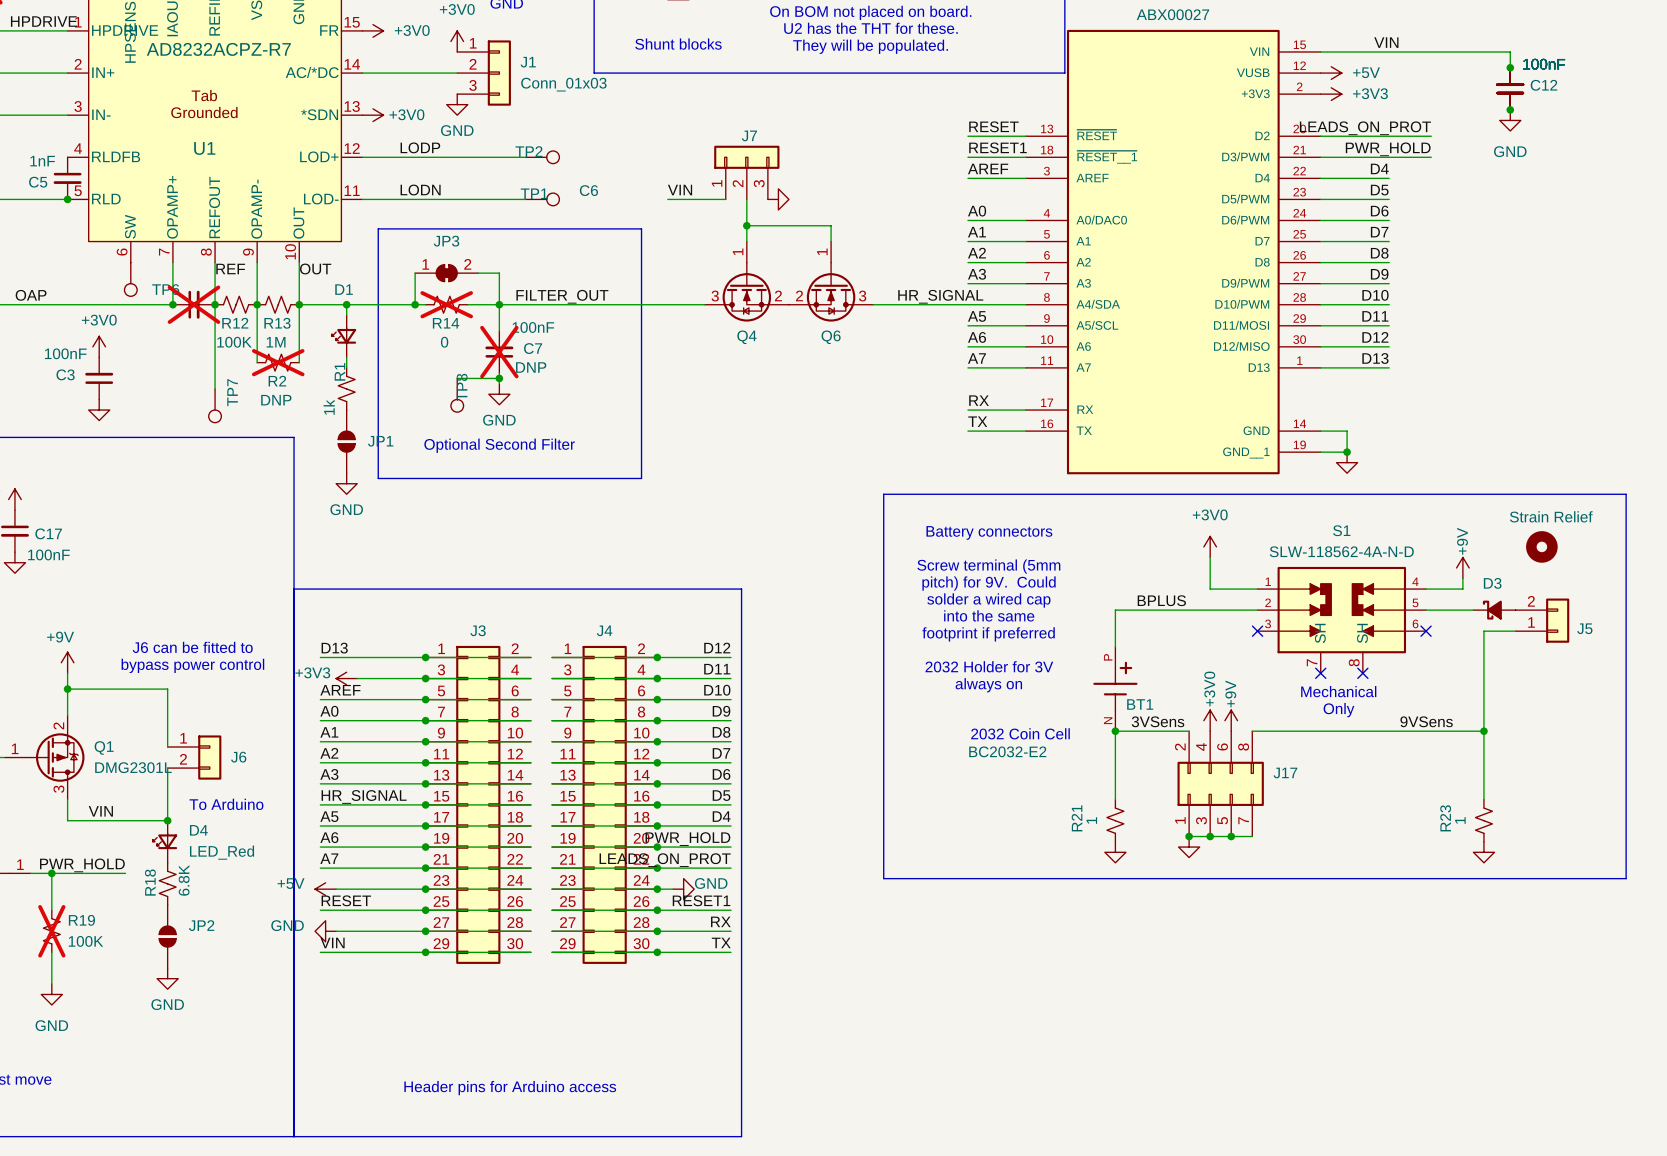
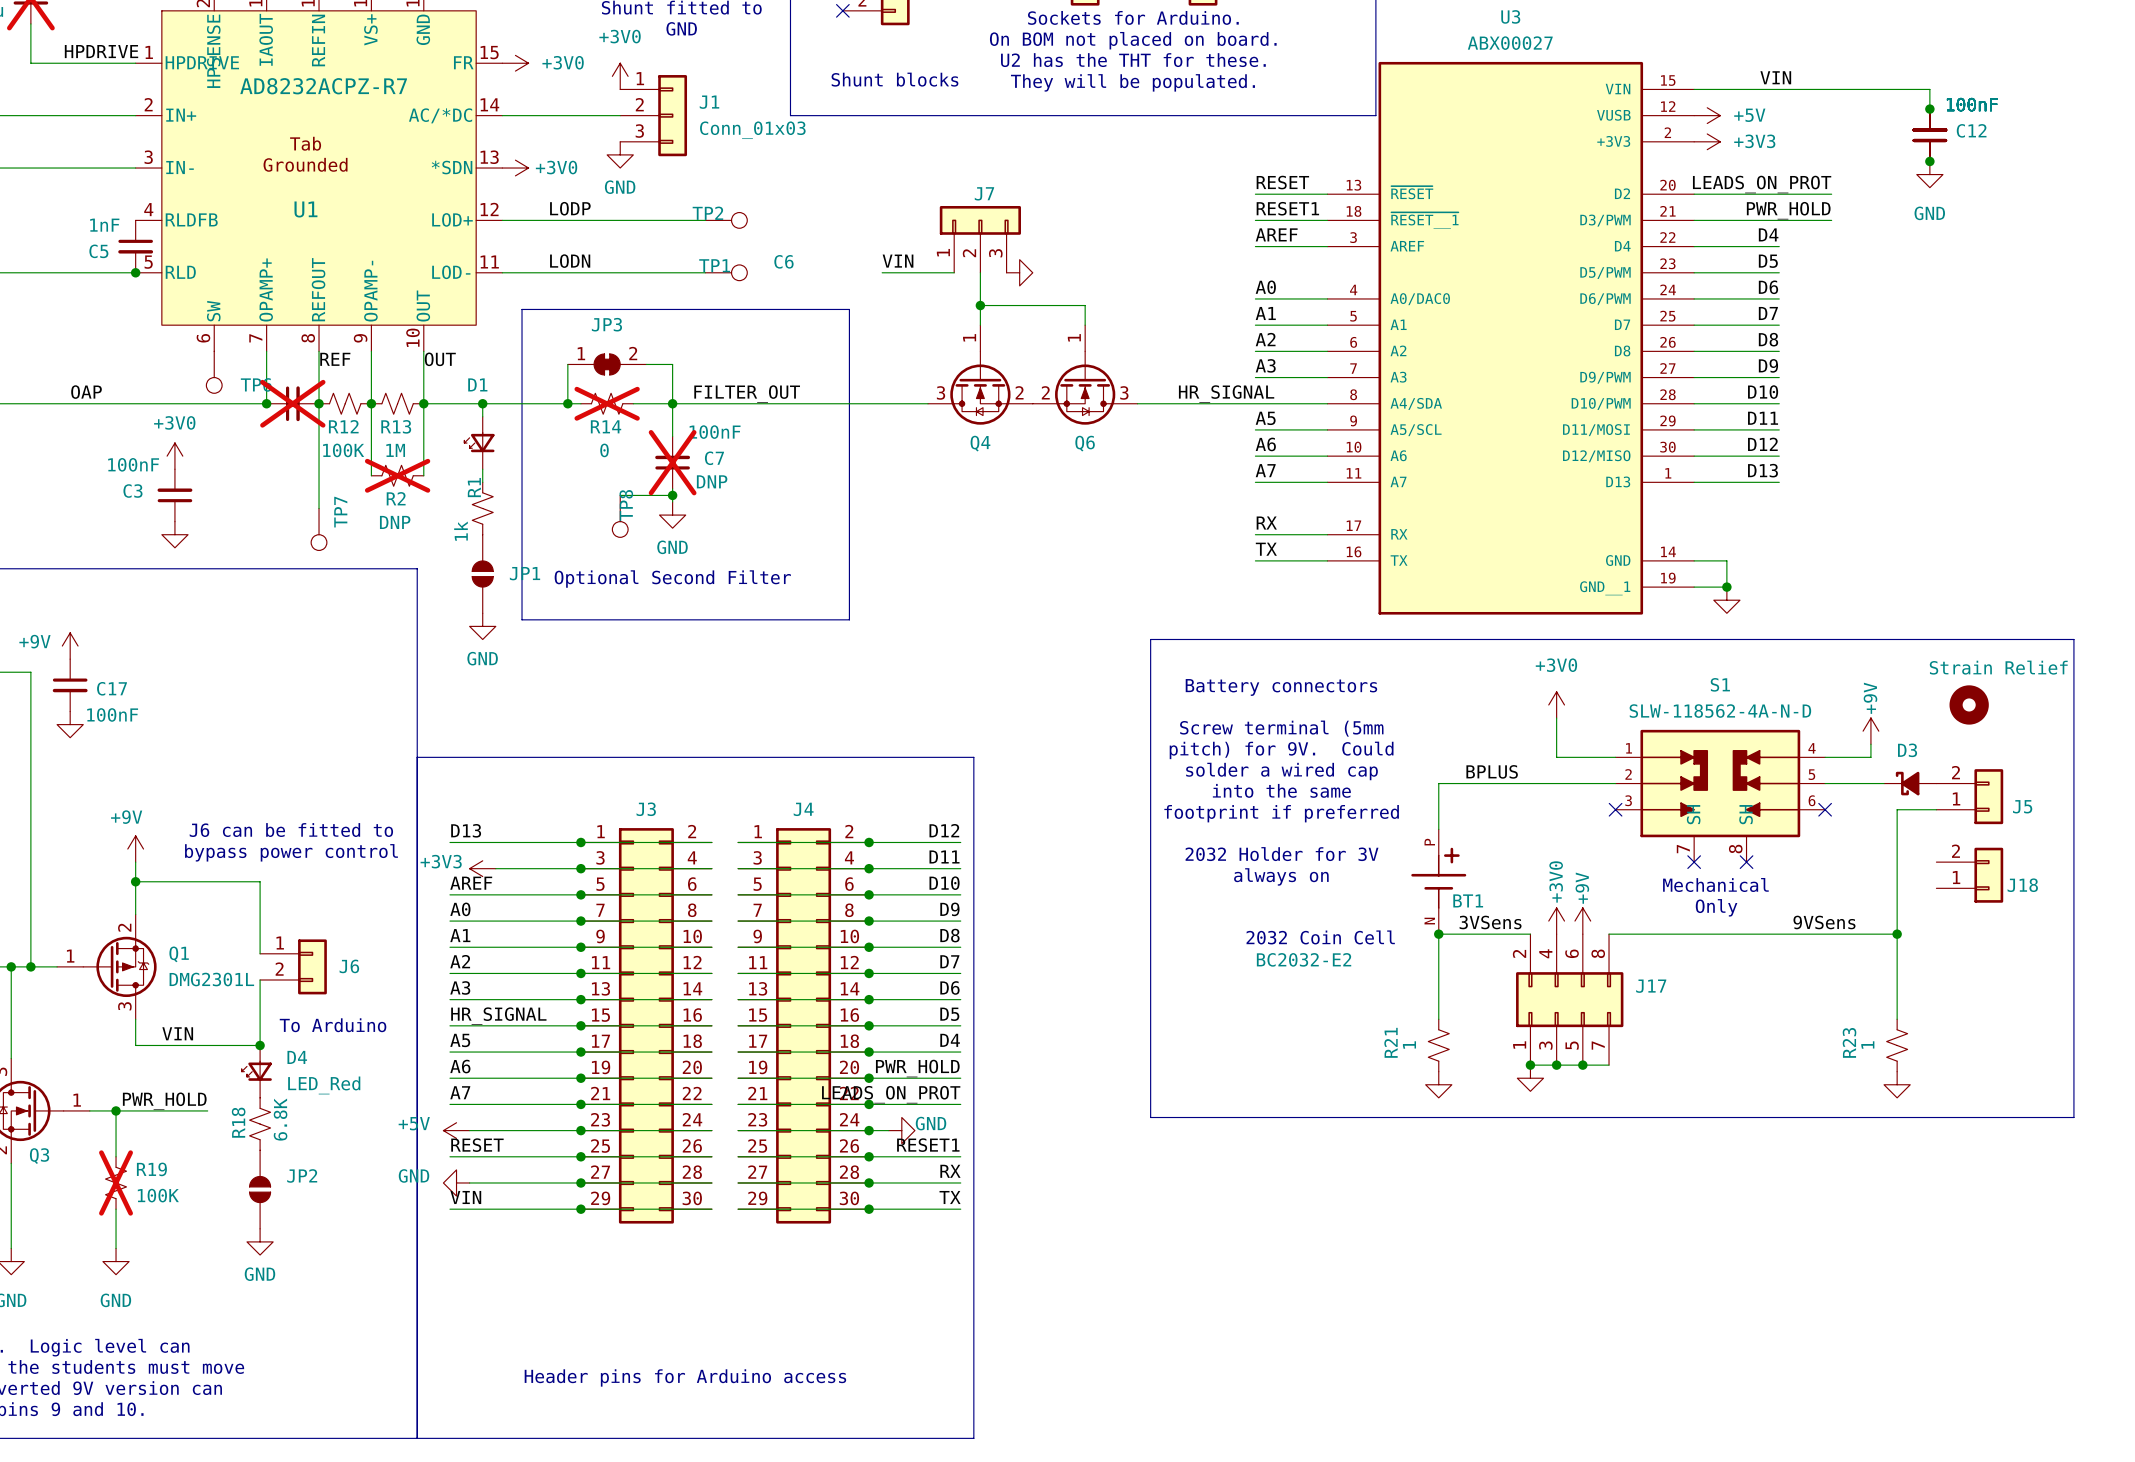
J18: none -> (1969, 875)

